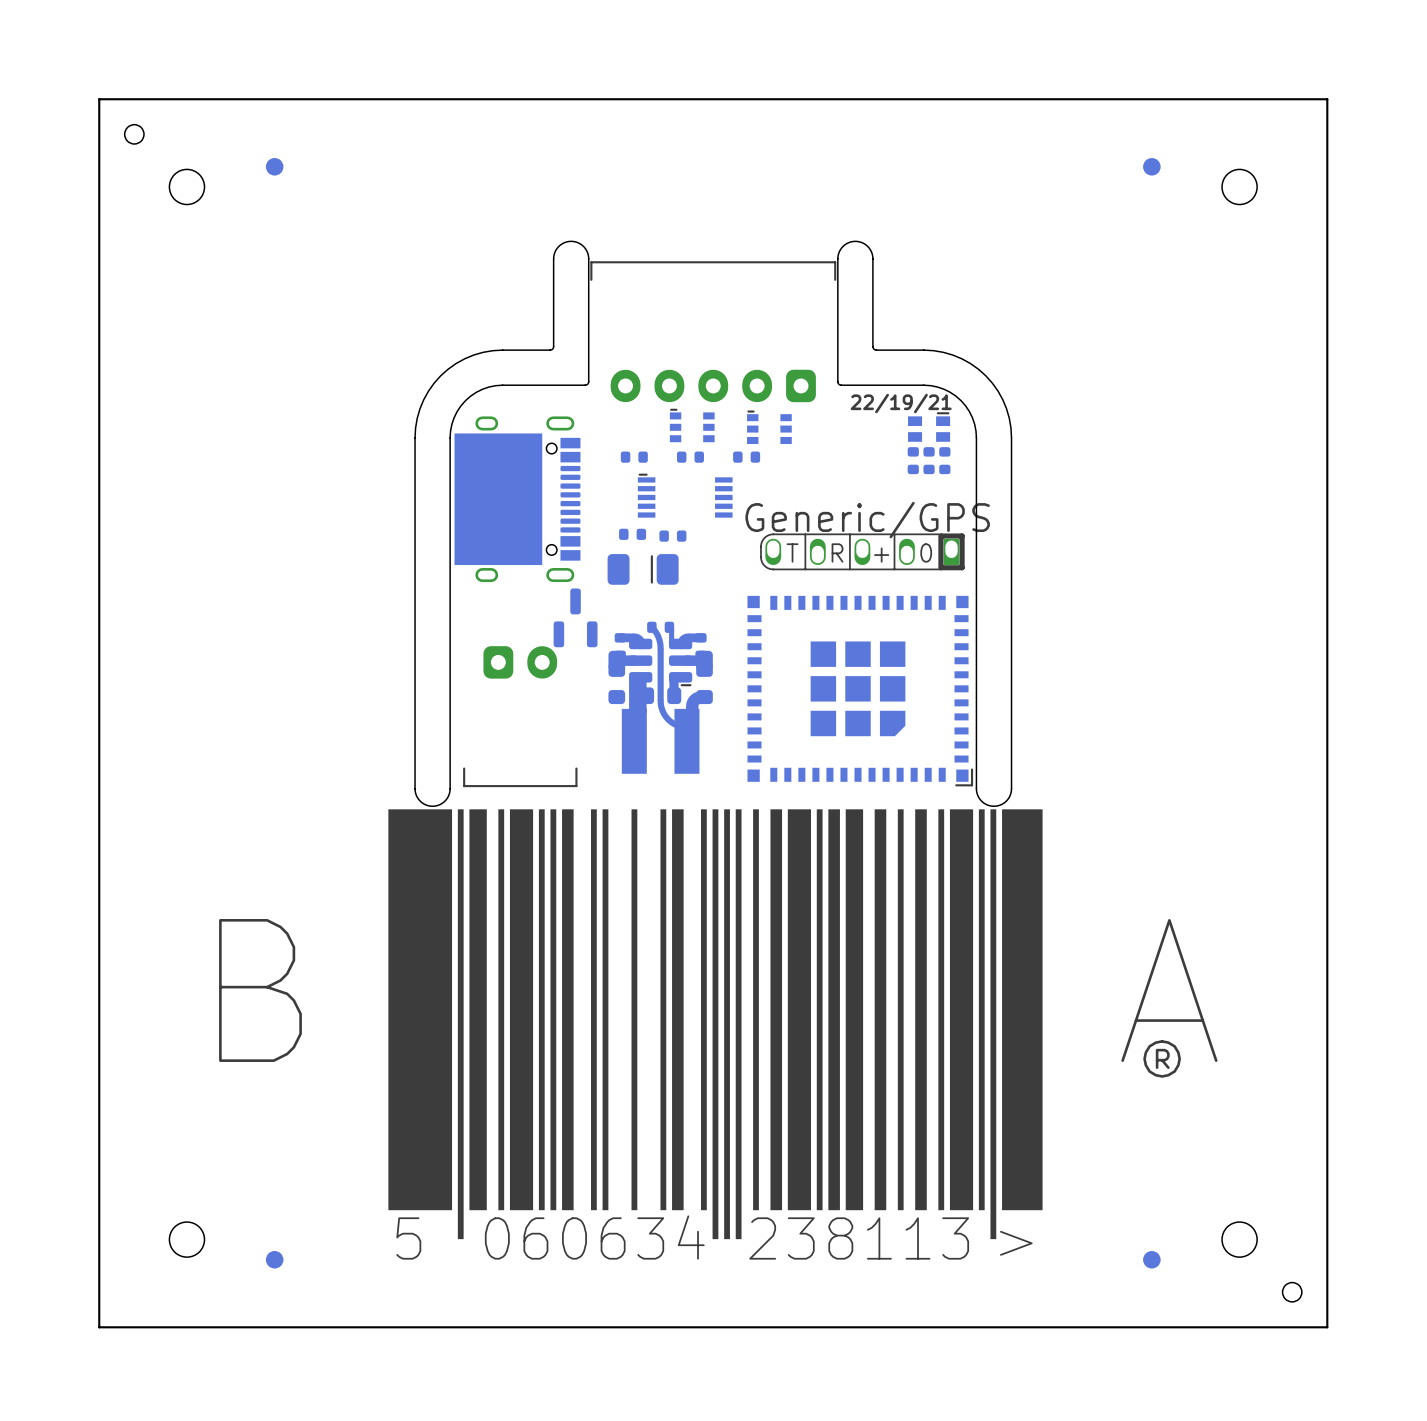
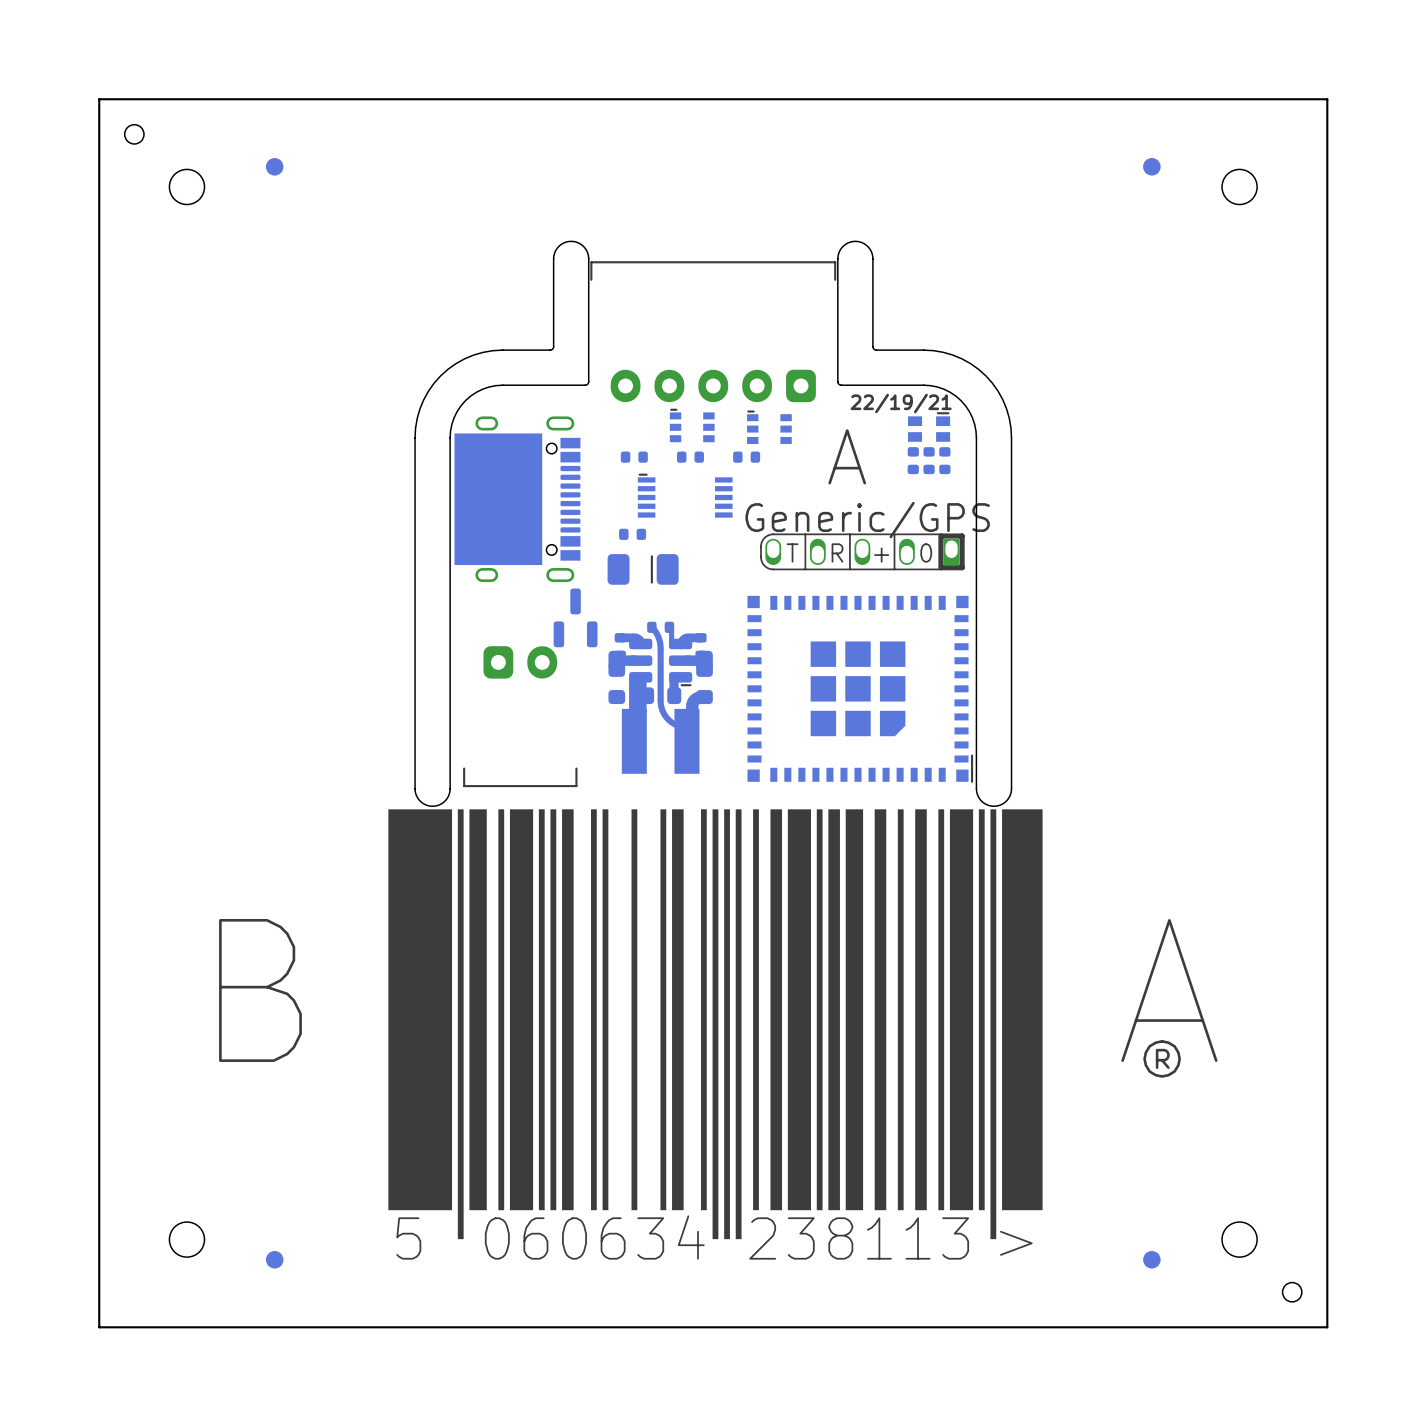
text: none -> A (847, 456)
part: (672, 536) -> none
part footprint: [747, 595, 974, 787] -> [747, 595, 974, 783]

